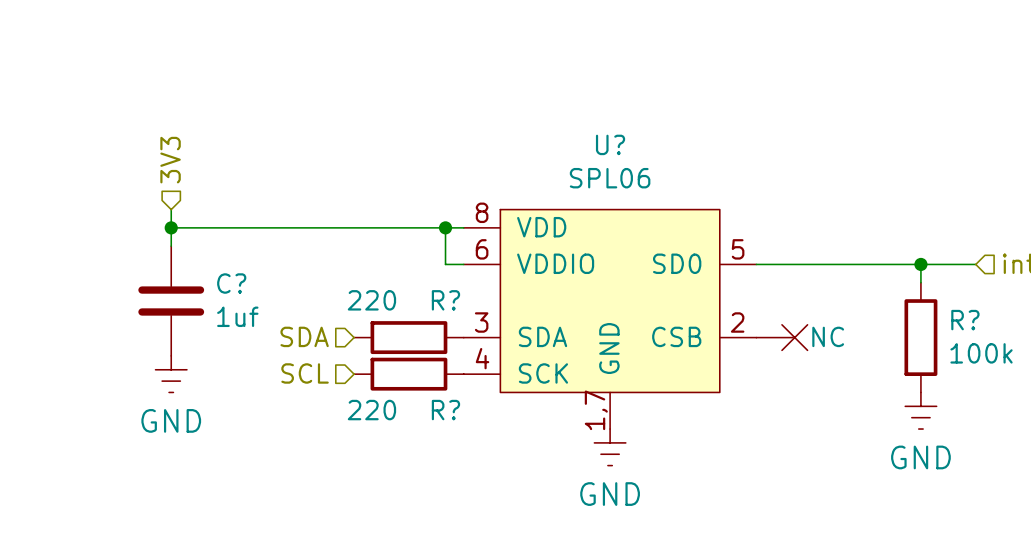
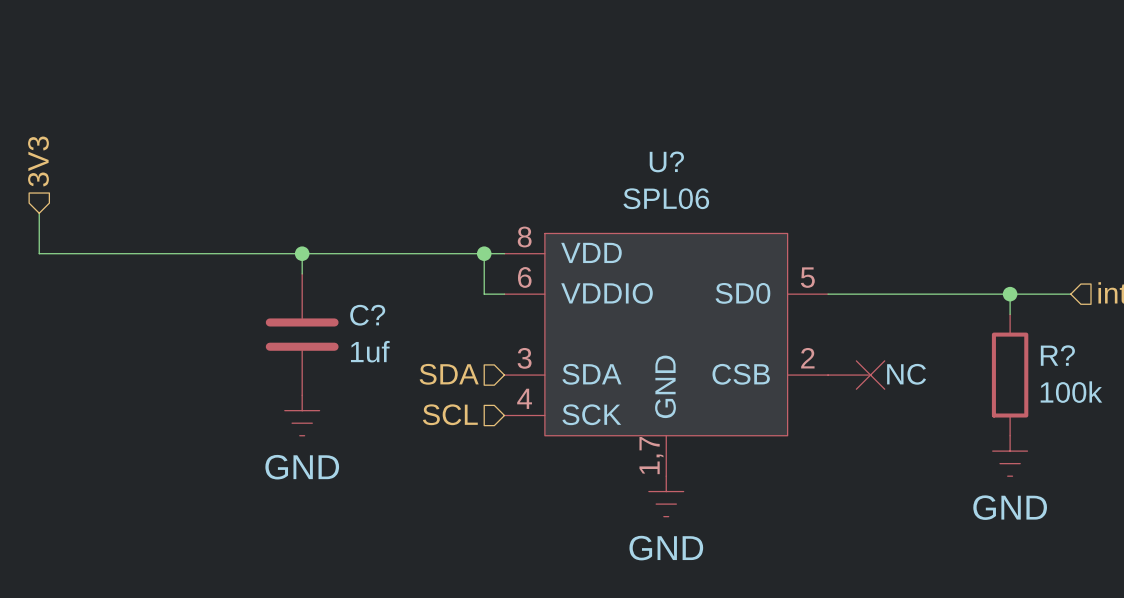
hierarchical label position: 3V3 (170, 160) -> 3V3 (38, 161)
wire: none -> (39, 213) (39, 253) (180, 253)
wire: (171, 209) (171, 246) -> none
junction: (171, 227) -> none
wire: none -> (302, 253) (302, 273)
junction: none -> (302, 253)
C? position: (171, 301) -> (302, 334)
hierarchical label position: SDA (304, 336) -> SDA (449, 374)
R?: 220 (408, 337) -> none
hierarchical label position: SCL (305, 373) -> SCL (450, 414)
power symbol position: GND (171, 374) -> GND (302, 415)
R?: 220 (408, 374) -> none

